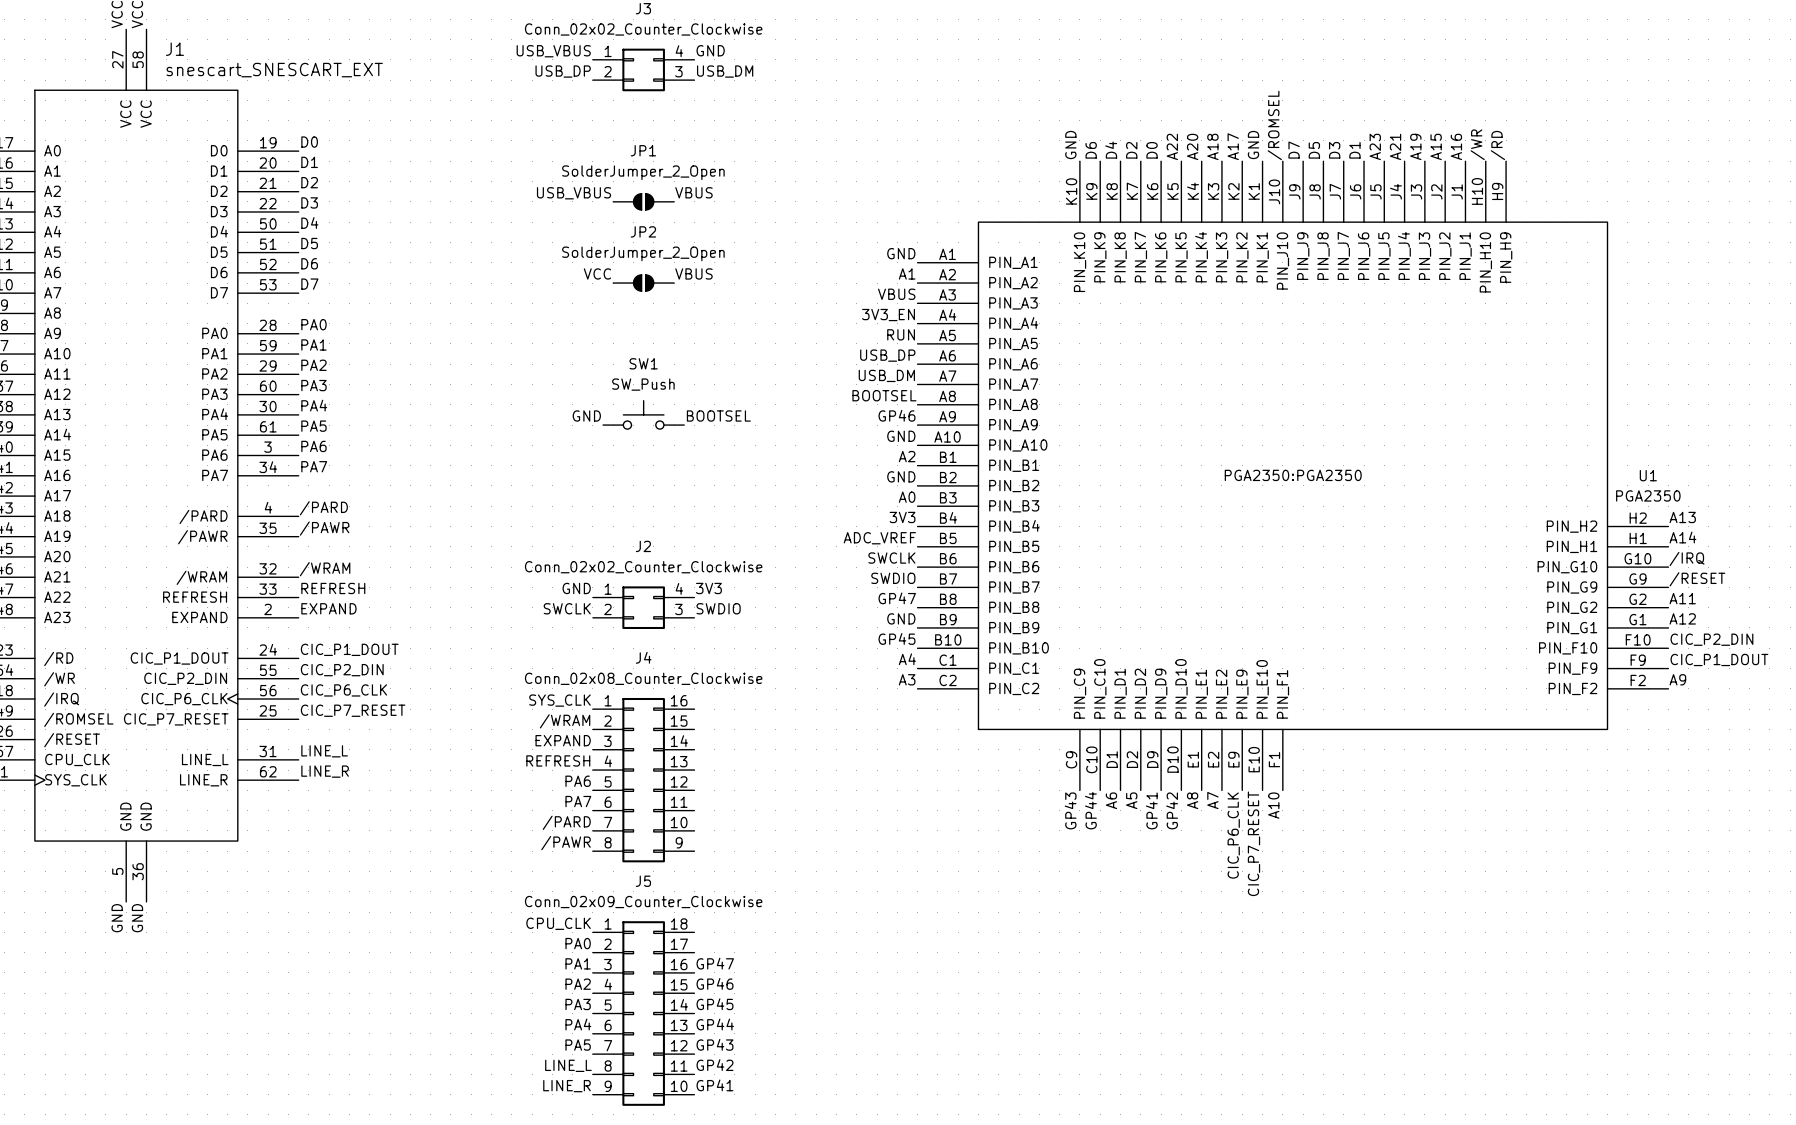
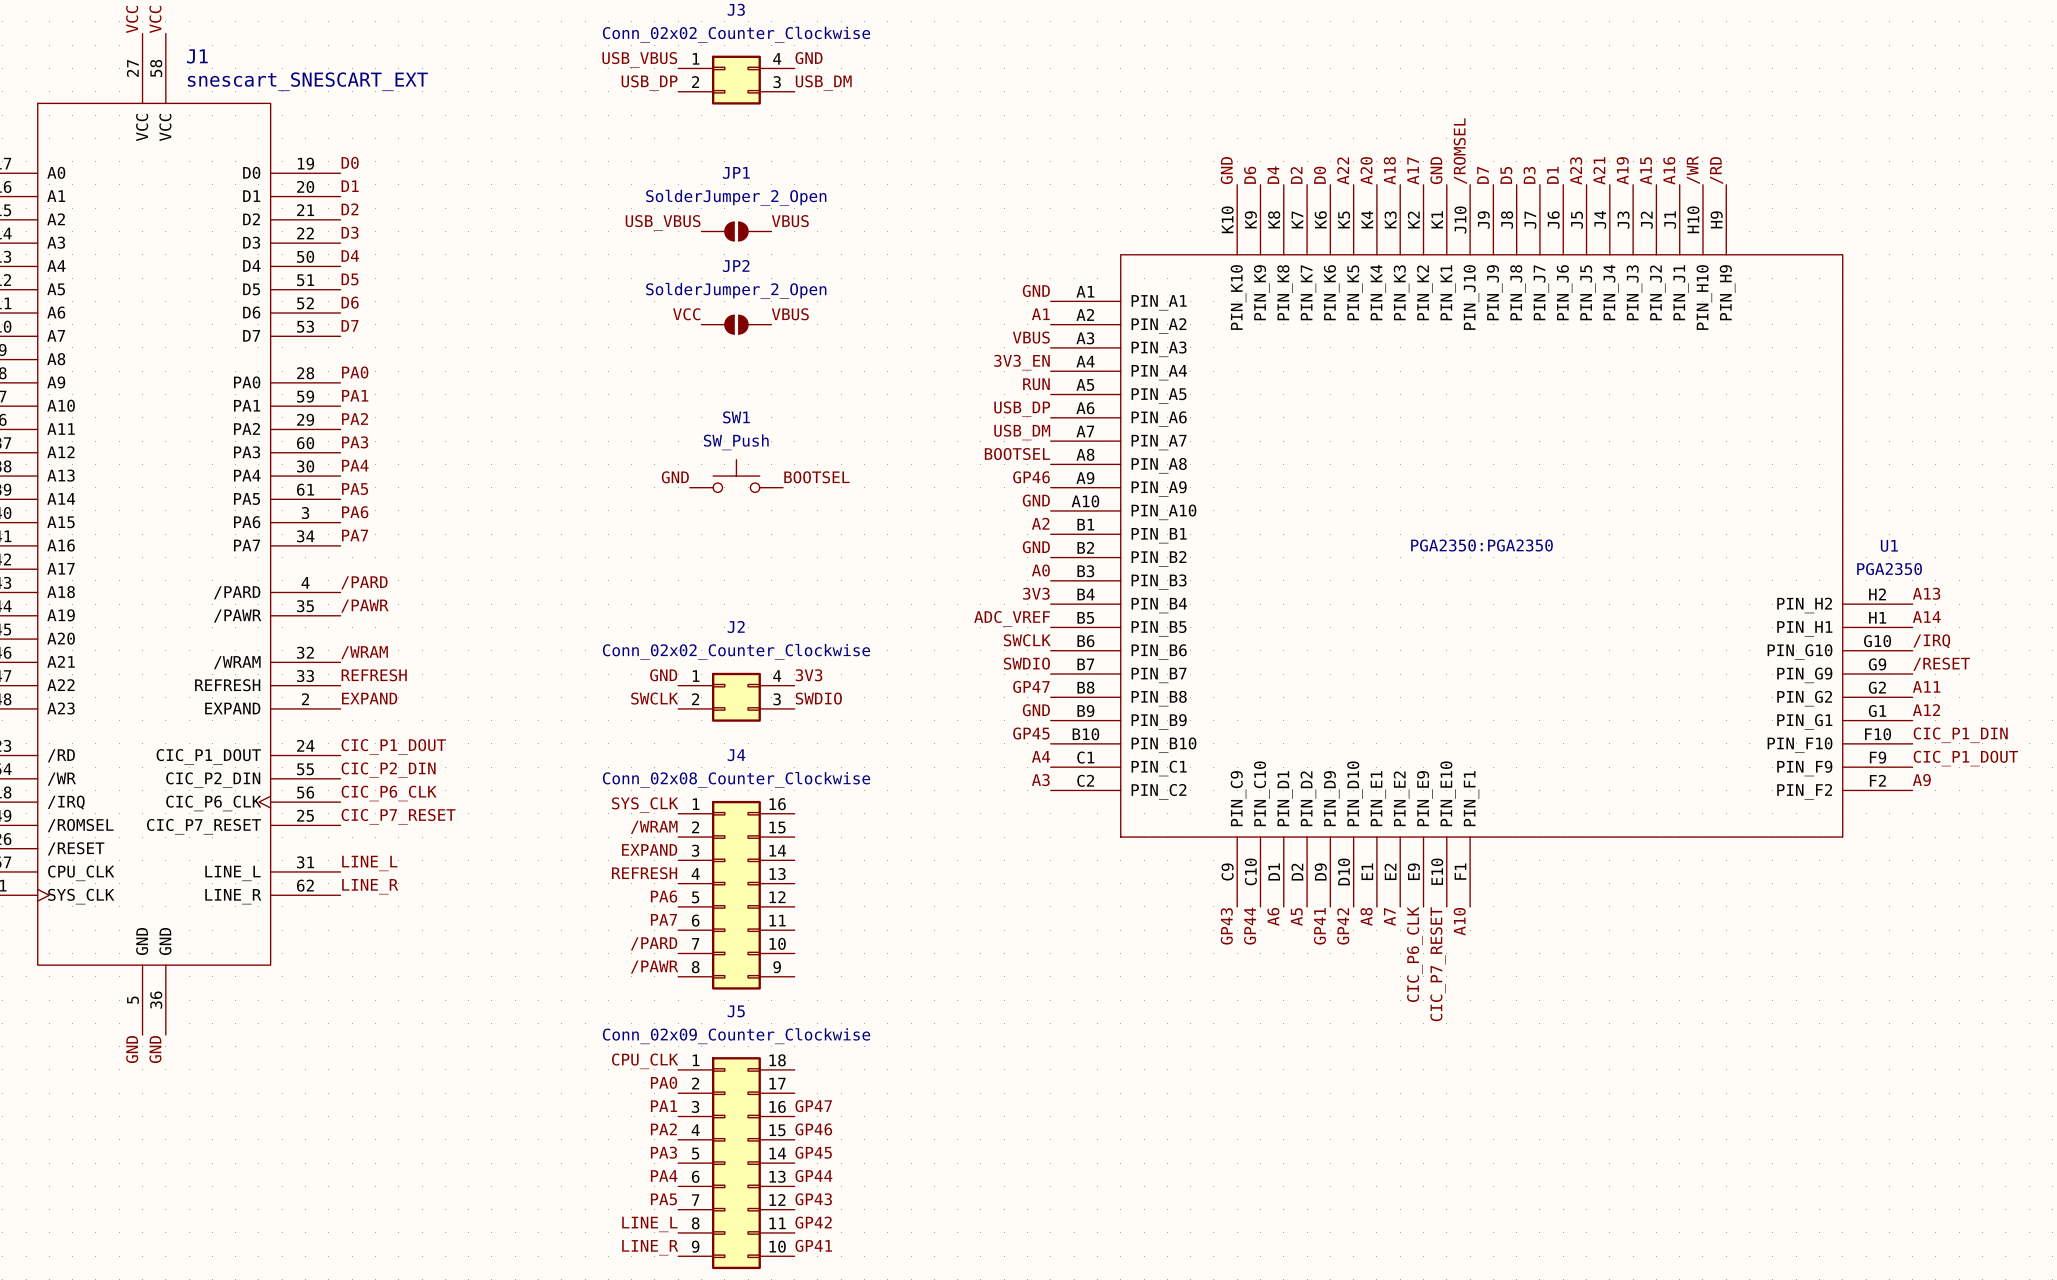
label: CIC_P2_DIN (1711, 639) -> CIC_P1_DIN (1960, 735)

